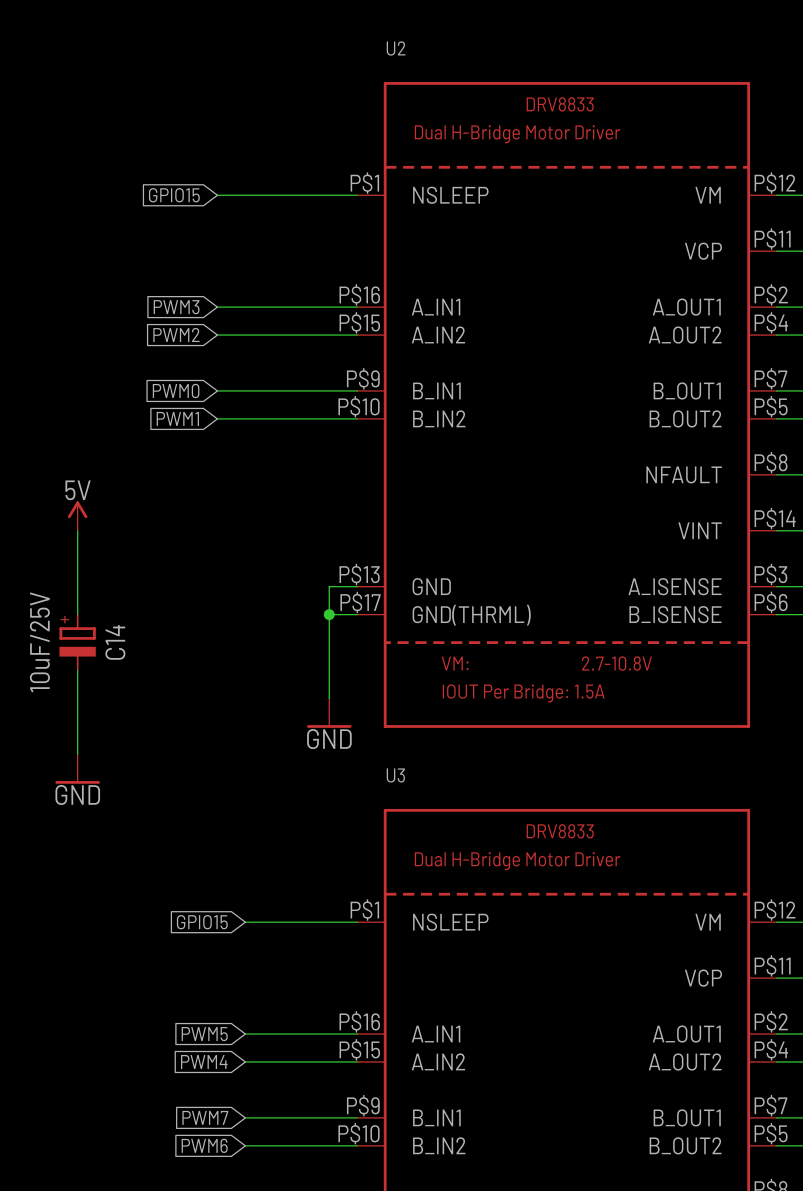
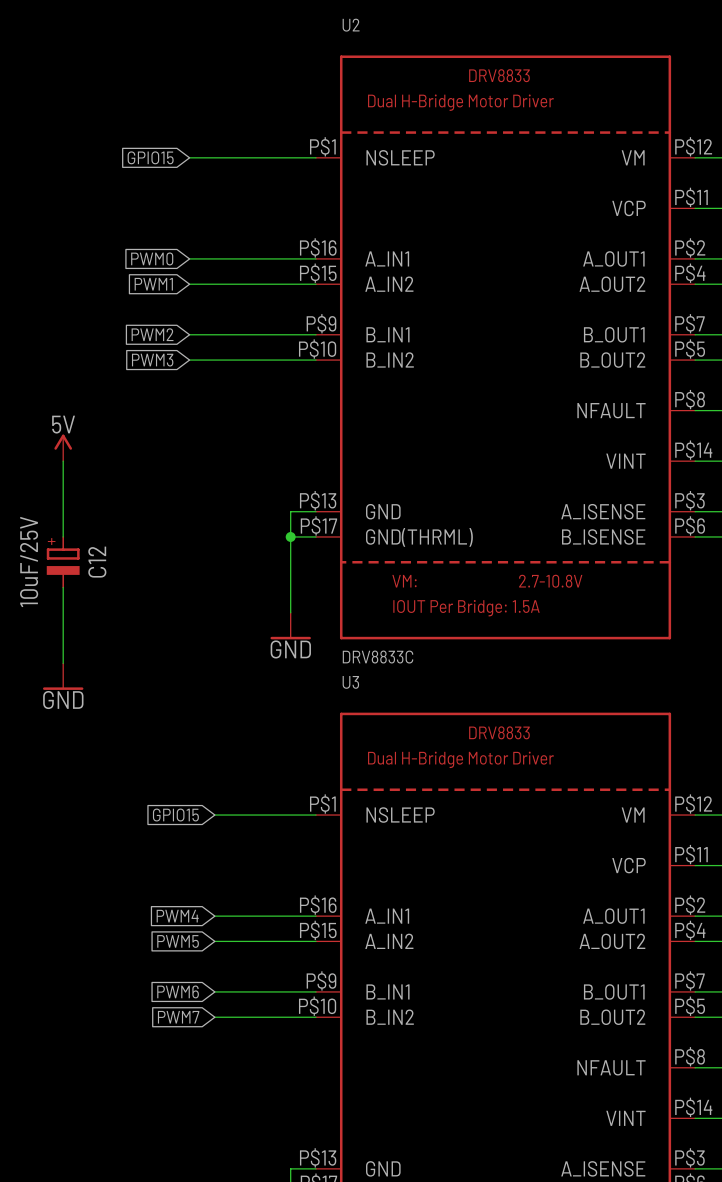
global label: PWM3 (176, 307) -> PWM0 (152, 258)
global label: PWM2 (176, 334) -> PWM1 (153, 284)
global label: PWM0 (176, 390) -> PWM2 (152, 334)
global label: PWM1 (177, 418) -> PWM3 (152, 360)
C14 name: C14 (115, 642) -> C12 (97, 562)
U2 value: none -> DRV8833C (378, 657)
global label: PWM5 (204, 1034) -> PWM4 (177, 916)
global label: PWM4 (204, 1061) -> PWM5 (178, 941)
global label: PWM7 (205, 1117) -> PWM6 (178, 991)
global label: PWM6 (204, 1145) -> PWM7 (178, 1017)

